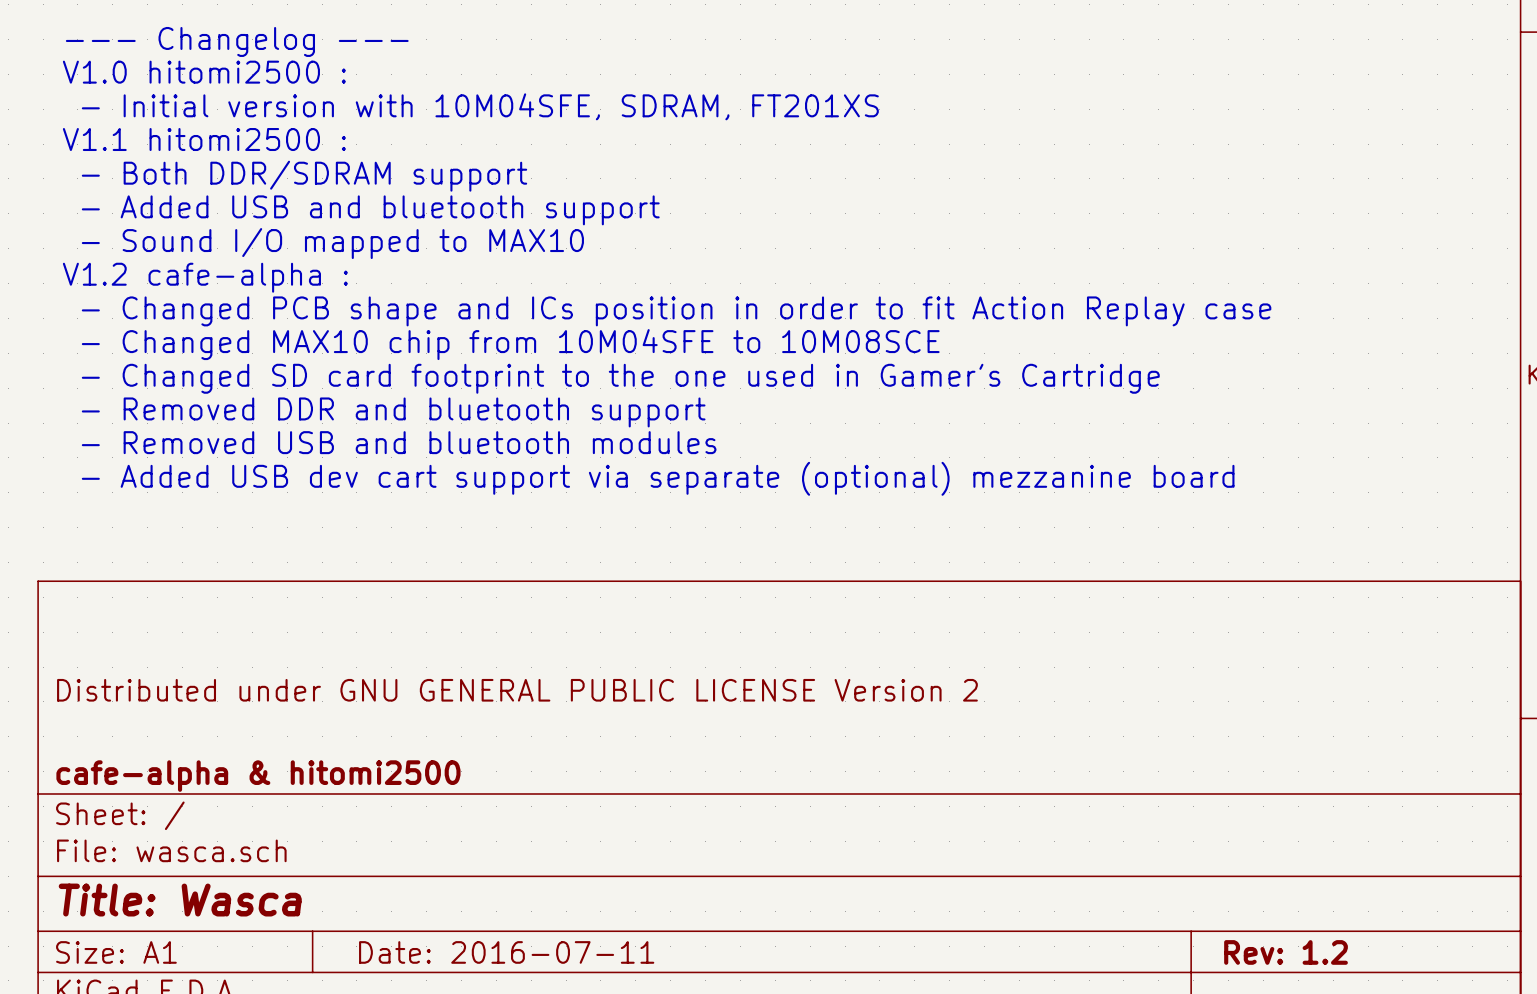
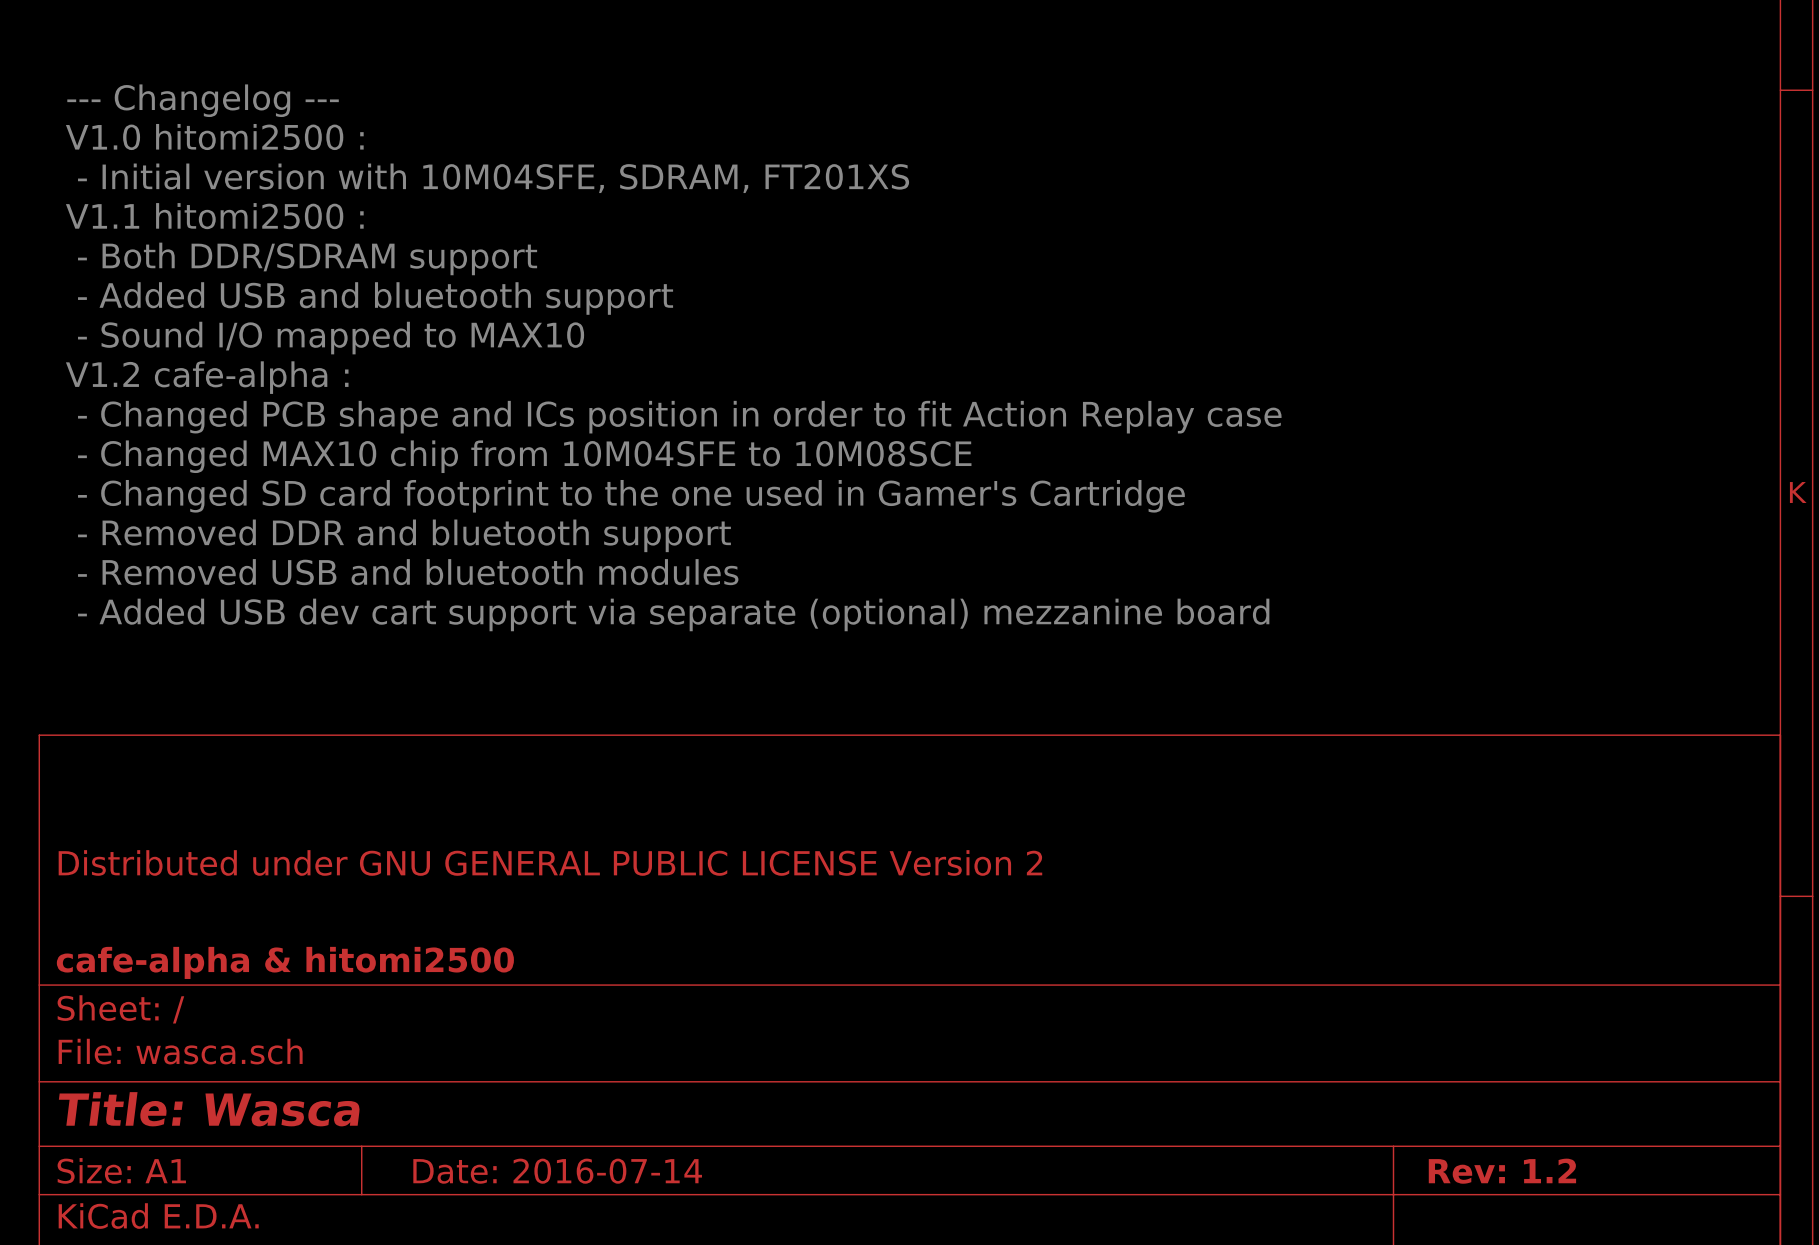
title block: Date: 2016-07-11 (506, 952) -> Date: 2016-07-14 (557, 1171)

